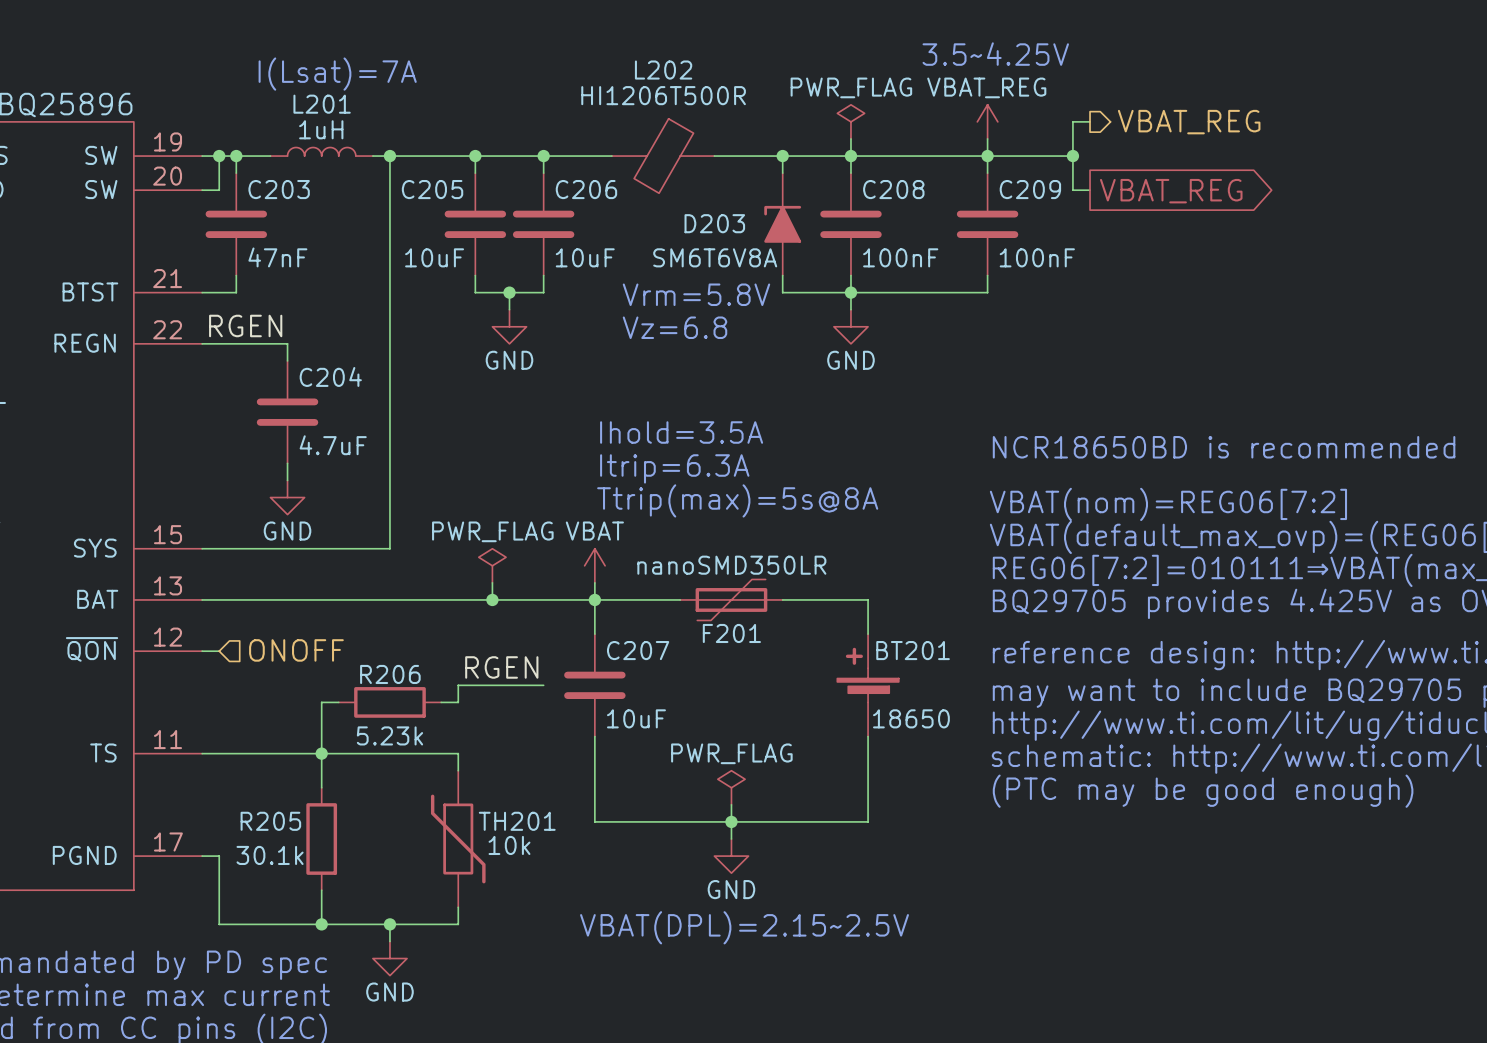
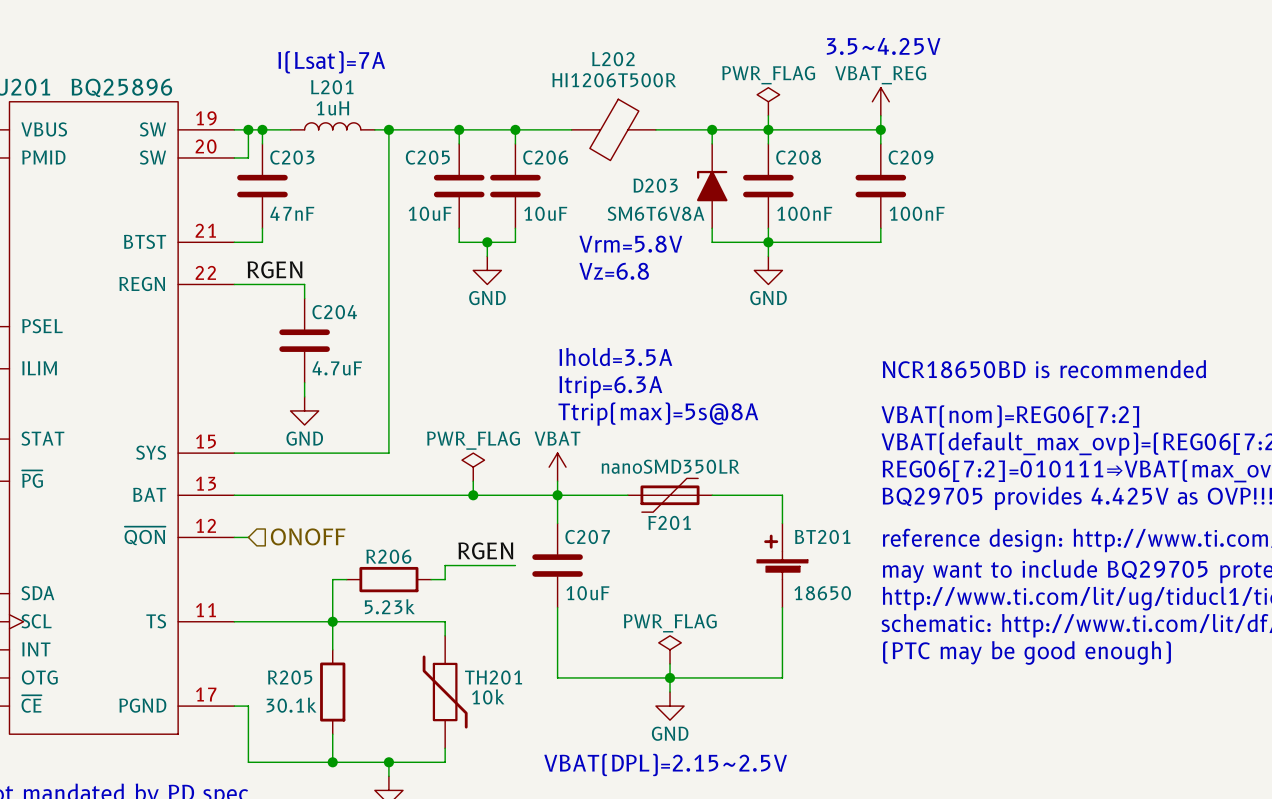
wire: (1090, 121) (1072, 121) (1072, 190) (1090, 190) -> none
hierarchical label: VBAT_REG (1189, 122) -> none
wire: (987, 156) (1072, 156) -> none
junction: (1072, 156) -> none
global label: VBAT_REG (1171, 191) -> none

